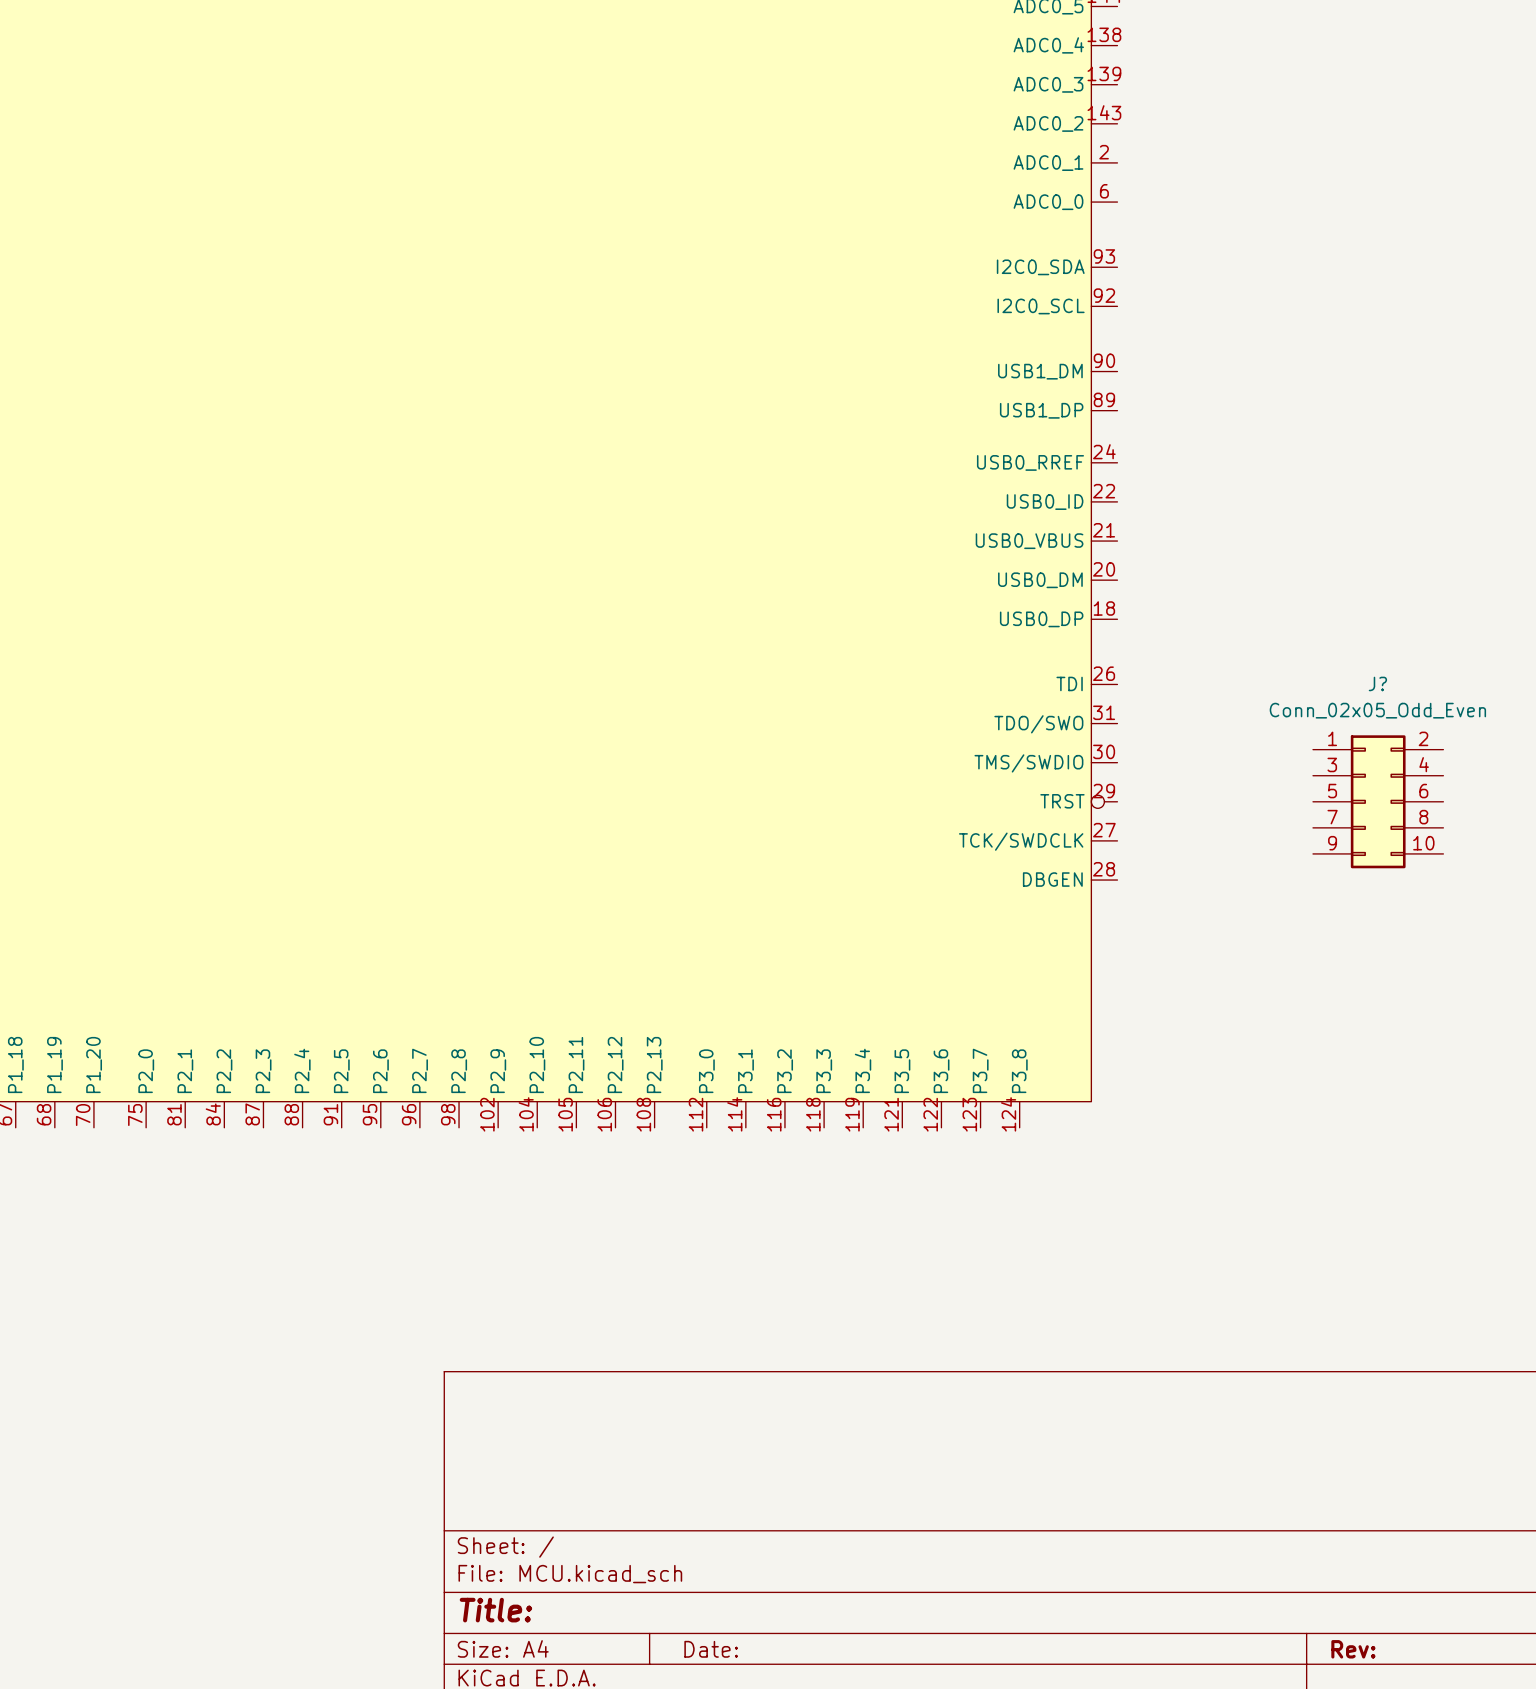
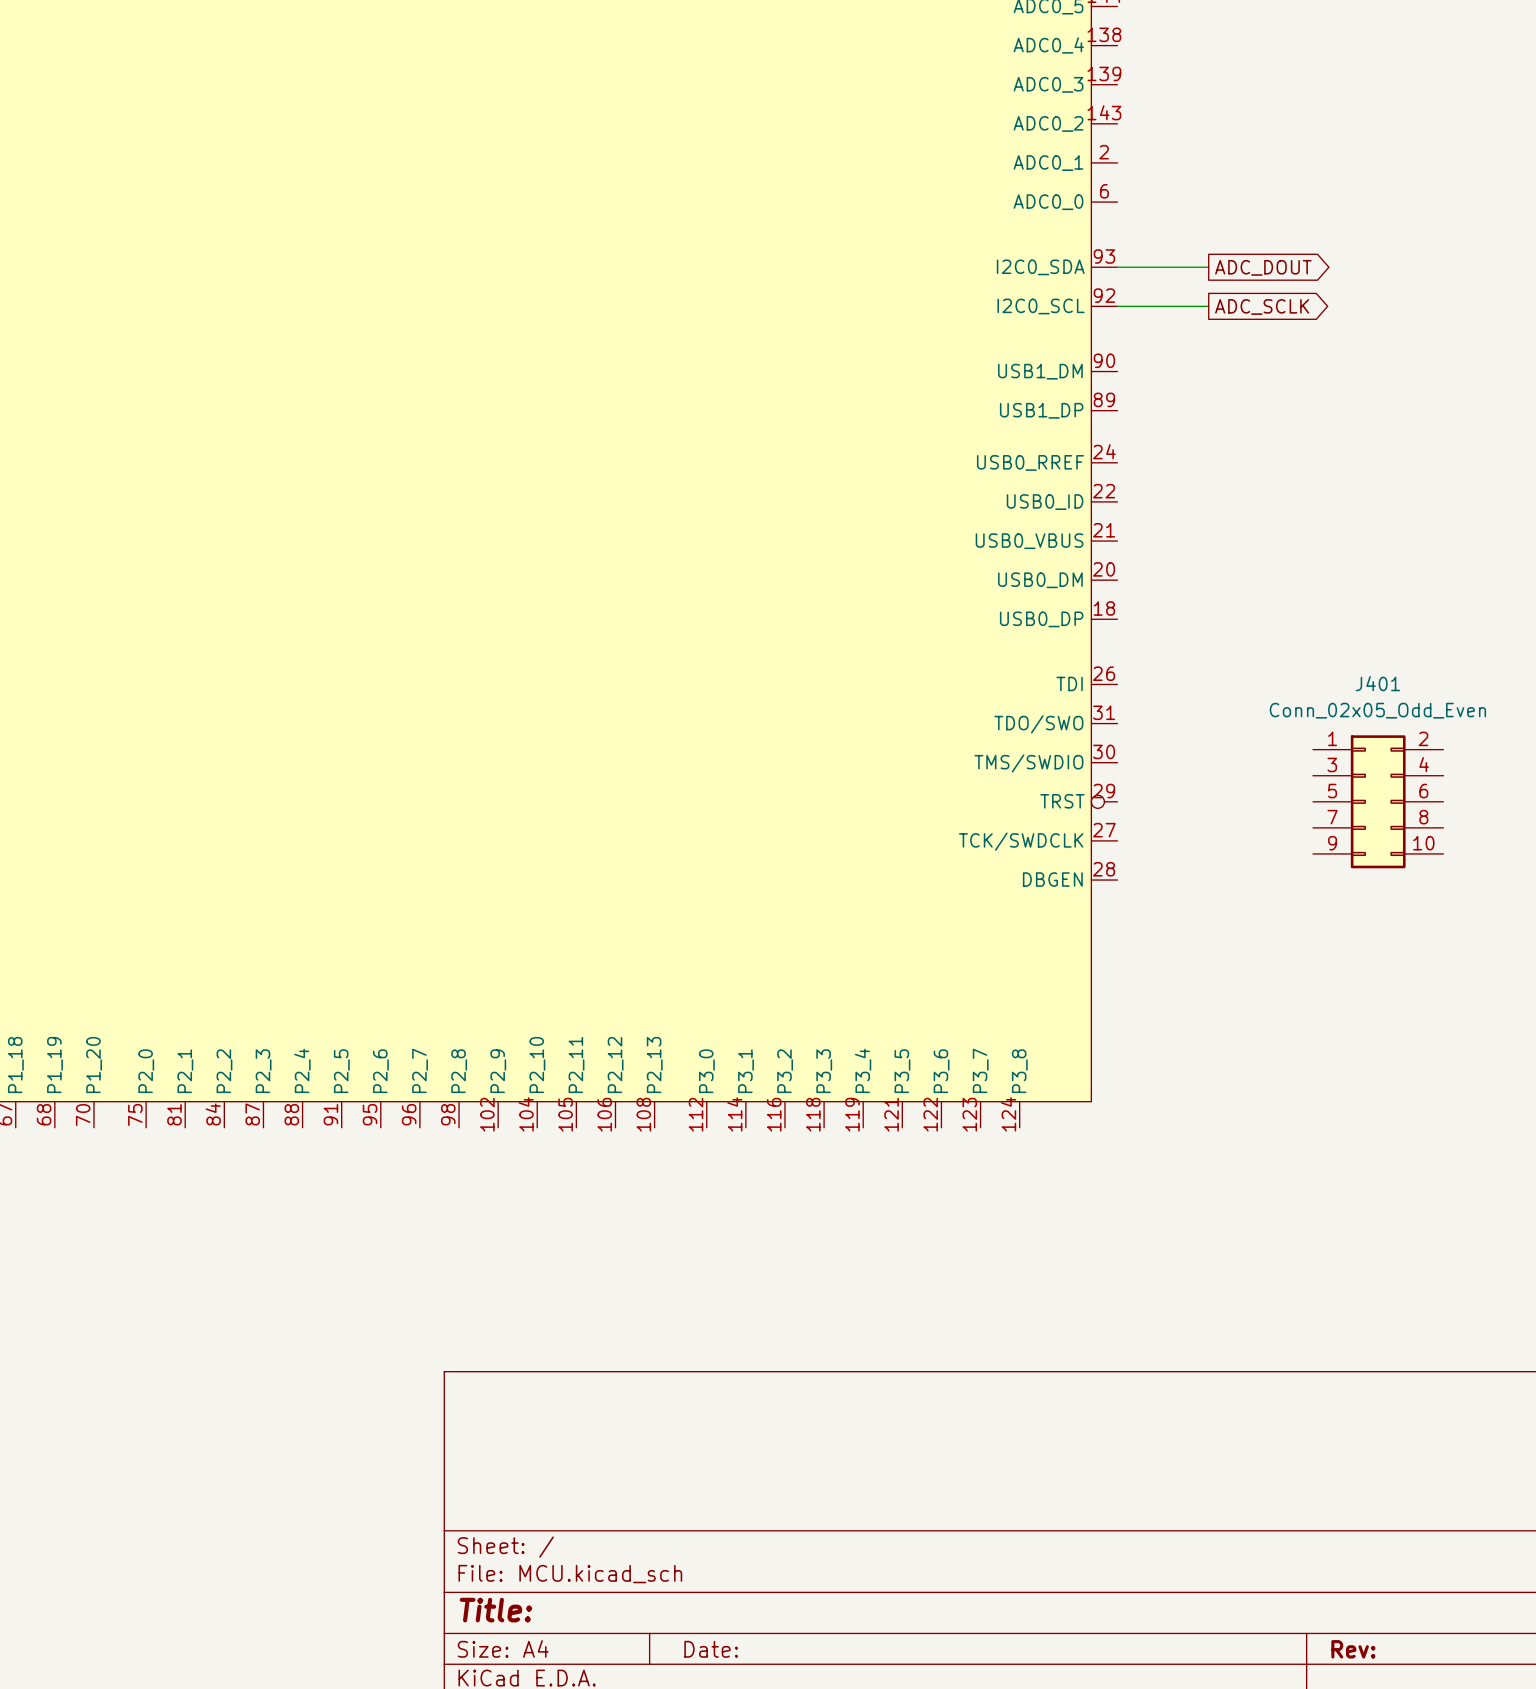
wire: none -> (1117, 267) (1208, 267)
global label: none -> ADC_DOUT (1263, 267)
wire: none -> (1117, 306) (1208, 306)
global label: none -> ADC_SCLK (1262, 306)
J? name: J? (1377, 683) -> J401 (1377, 683)

